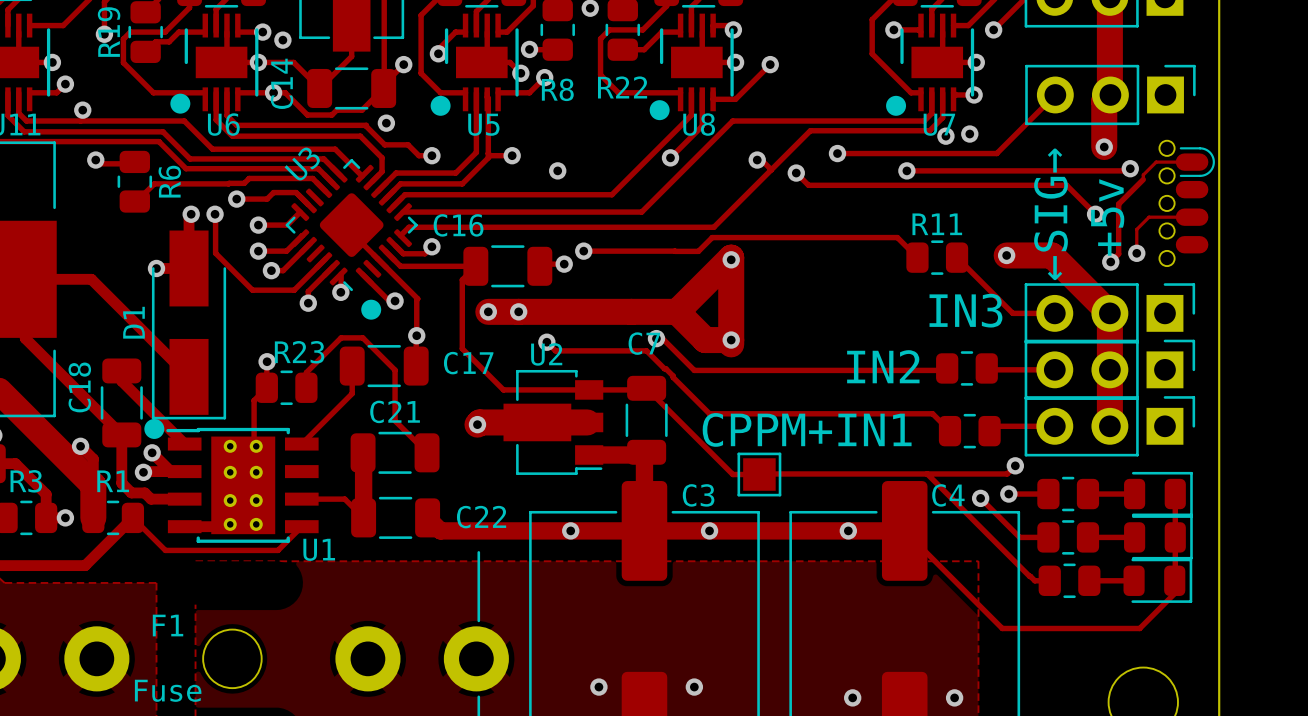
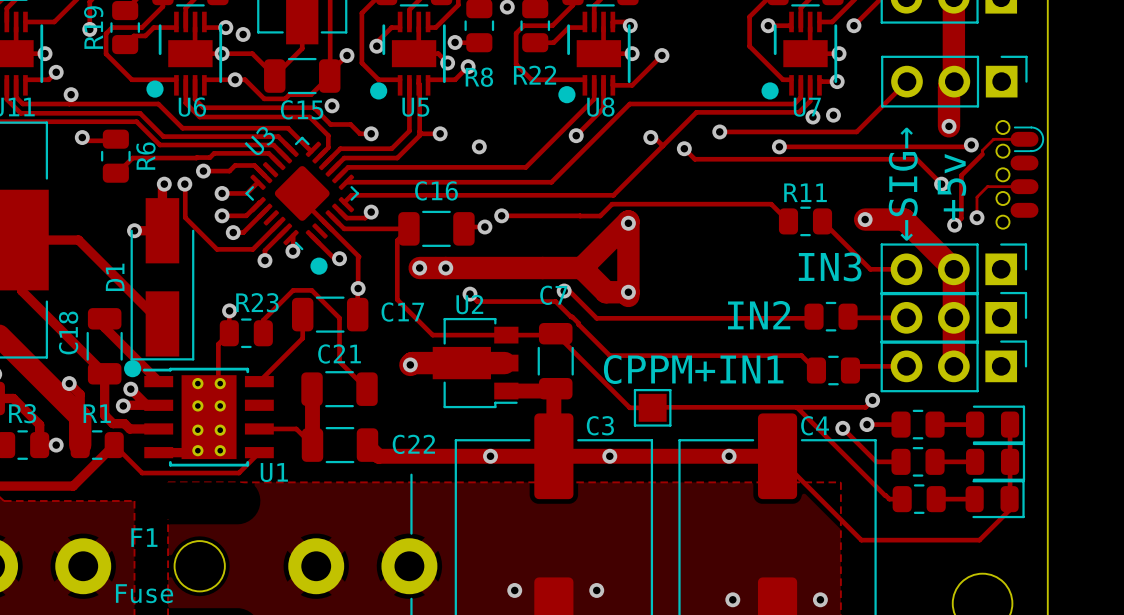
C14 name: C14 (282, 83) -> C15 (302, 109)
C16 name position: C16 (458, 225) -> C16 (436, 190)

